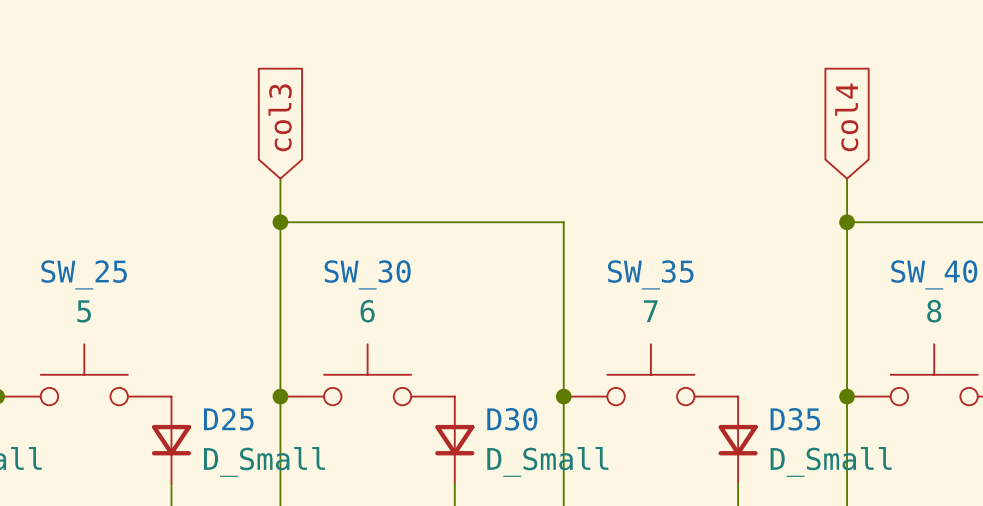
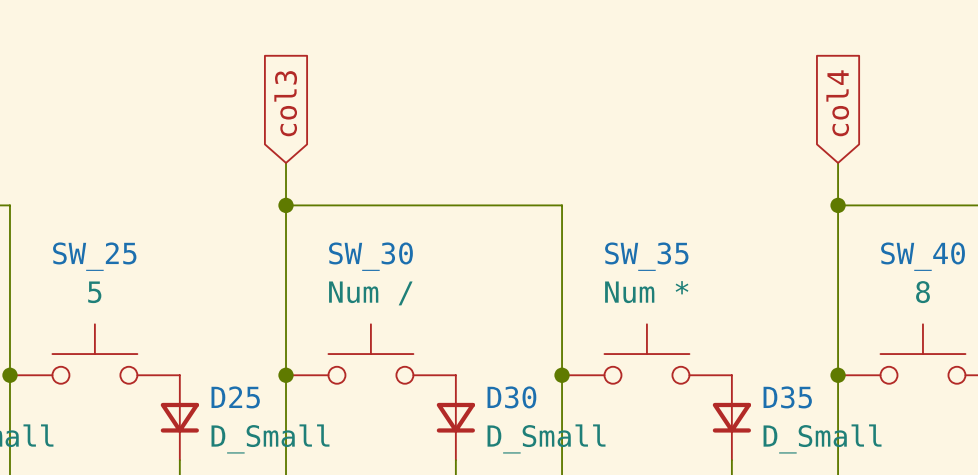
SW_30 value: 6 (367, 311) -> Num / (370, 293)
SW_35 value: 7 (650, 311) -> Num * (646, 292)

